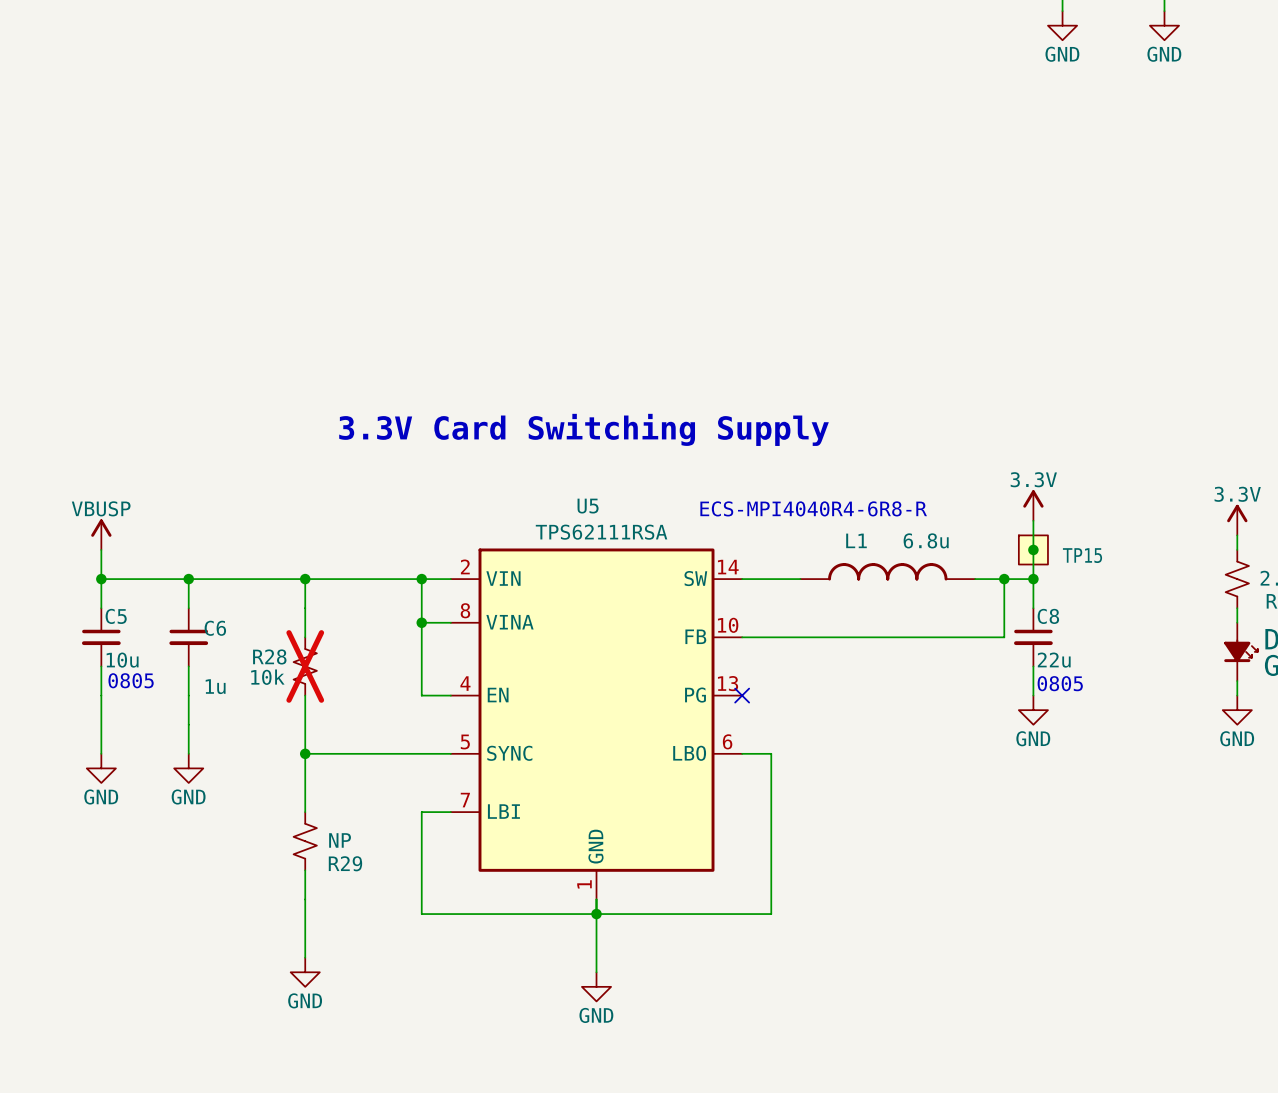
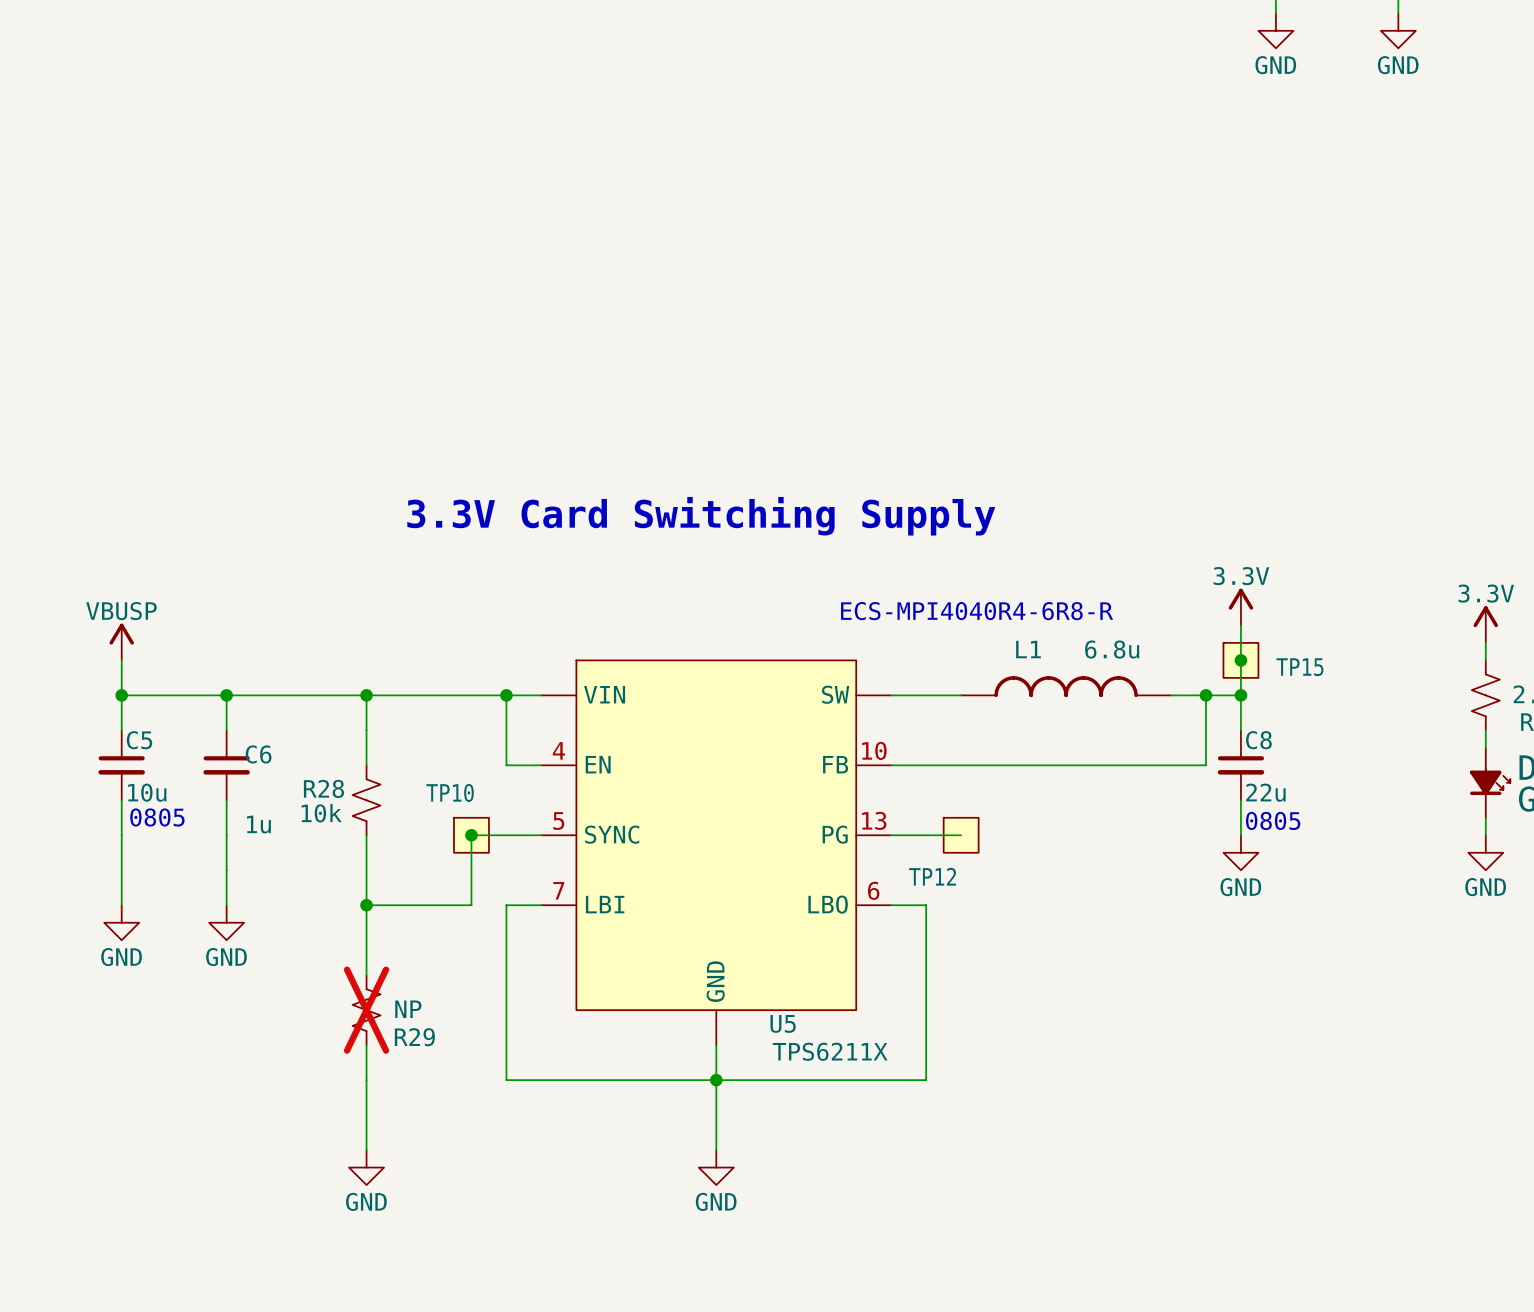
U5 name position: U5 (588, 506) -> U5 (783, 1023)
U5 value: TPS62111RSA (601, 532) -> TPS6211X (830, 1051)
U5 symbol: [450, 548, 743, 900] -> [541, 660, 892, 1046]
wire: (421, 622) (450, 622) -> none
junction: (421, 622) -> none
wire: (421, 637) (421, 695) -> (506, 765) (541, 765)
R28 do-not-place cross: (305, 666) -> none
junction: none -> (471, 835)
TP10: none -> (471, 835)
wire: none -> (891, 835) (961, 835)
no-connect mark: (742, 695) -> none
TP12: none -> (961, 835)
wire: (392, 753) (421, 753) -> (471, 905) (471, 835) (506, 835)
wire: (421, 812) (450, 812) -> (506, 975) (506, 905)
R29 do-not-place cross: none -> (366, 1010)
wire: (421, 899) (421, 914) (771, 914) (771, 899) -> (506, 1080) (926, 1080)
junction position: (596, 914) -> (716, 1080)
power symbol position: GND (596, 986) -> GND (716, 1167)

